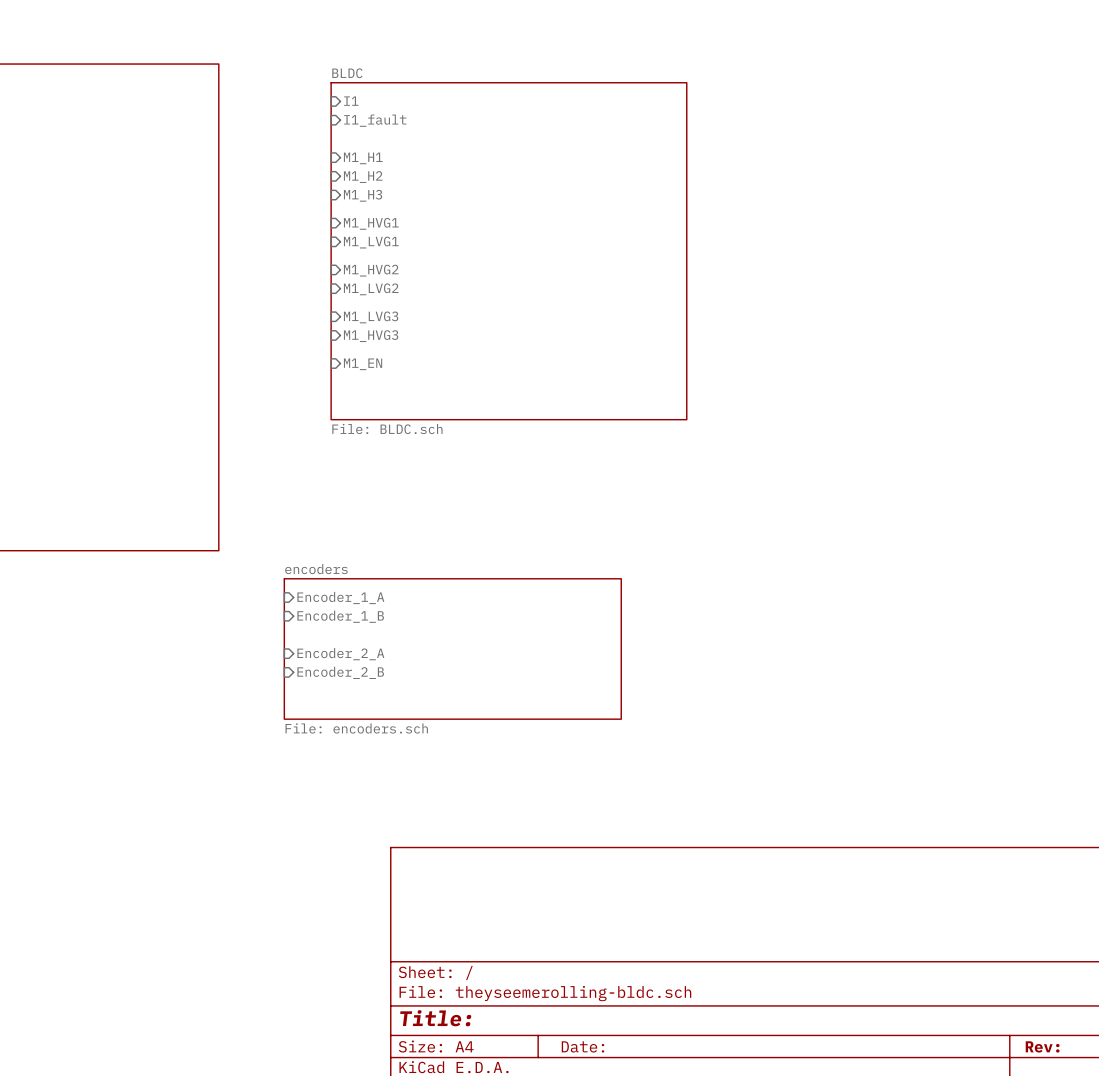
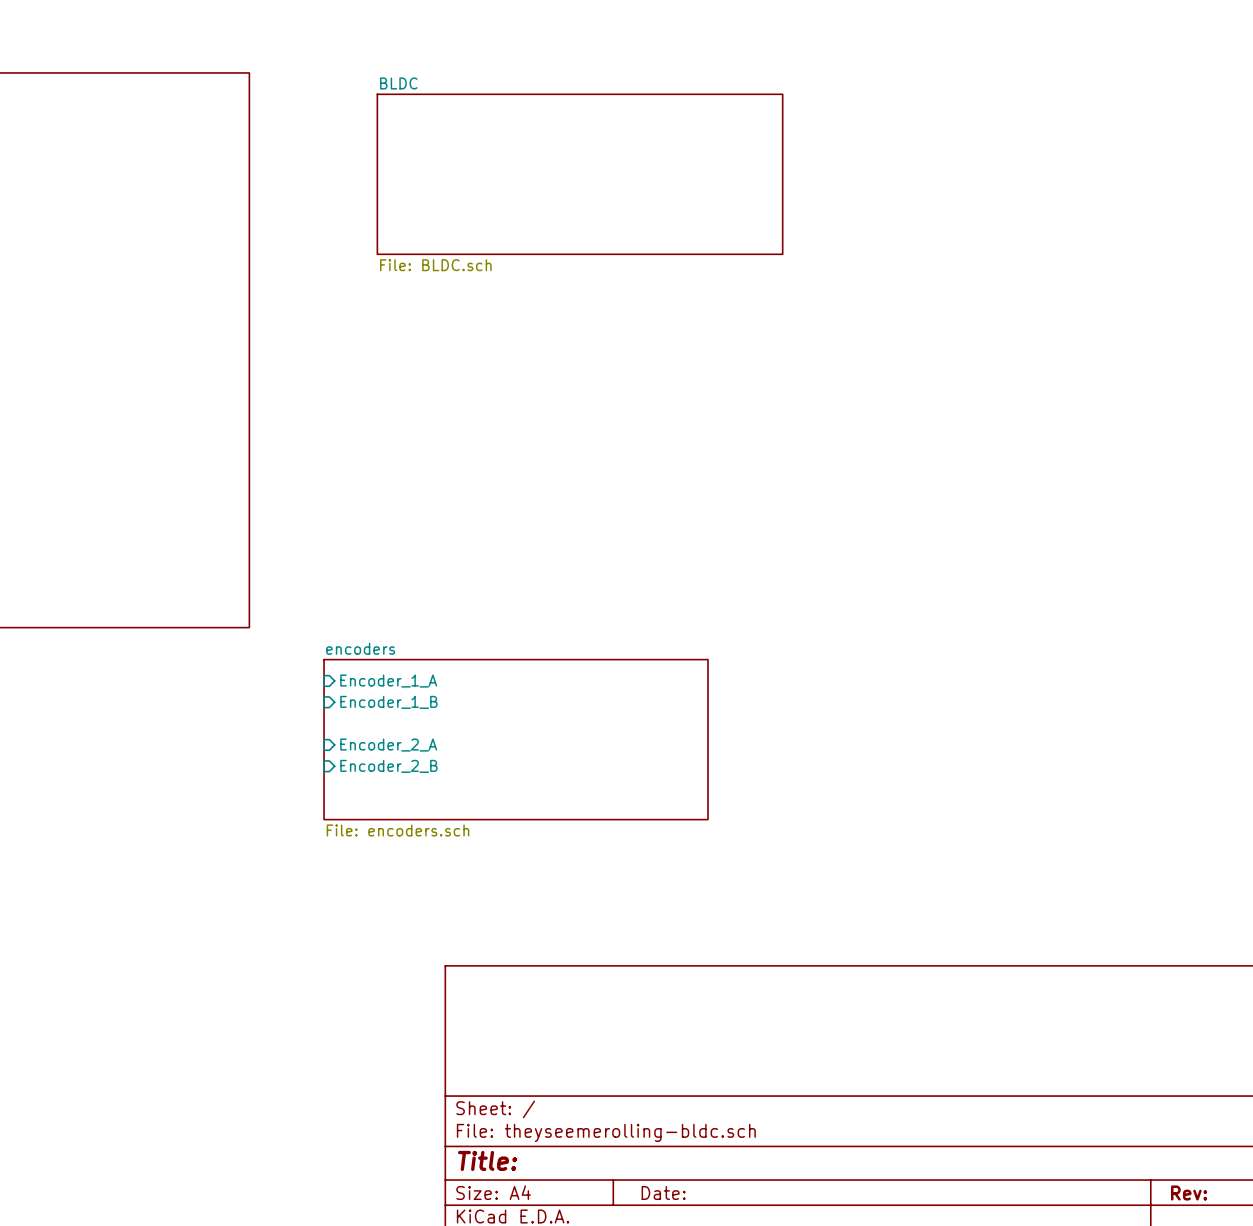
sheet pin: I1 (351, 101) -> none
sheet pin: I1_fault (375, 120) -> none
sheet BLDC: none -> File: BLDC.sch (580, 174)
sheet pin: M1_H1 (363, 158) -> none
sheet pin: M1_H2 (363, 177) -> none
sheet pin: M1_H3 (363, 195) -> none
sheet pin: M1_HVG1 (371, 223) -> none
sheet pin: M1_LVG1 (371, 242) -> none
sheet BLDC: File: BLDC.sch (508, 251) -> none
sheet pin: M1_HVG2 (371, 270) -> none
sheet pin: M1_LVG2 (371, 289) -> none
sheet pin: M1_LVG3 (371, 317) -> none
sheet pin: M1_HVG3 (371, 336) -> none
sheet pin: M1_EN (363, 364) -> none

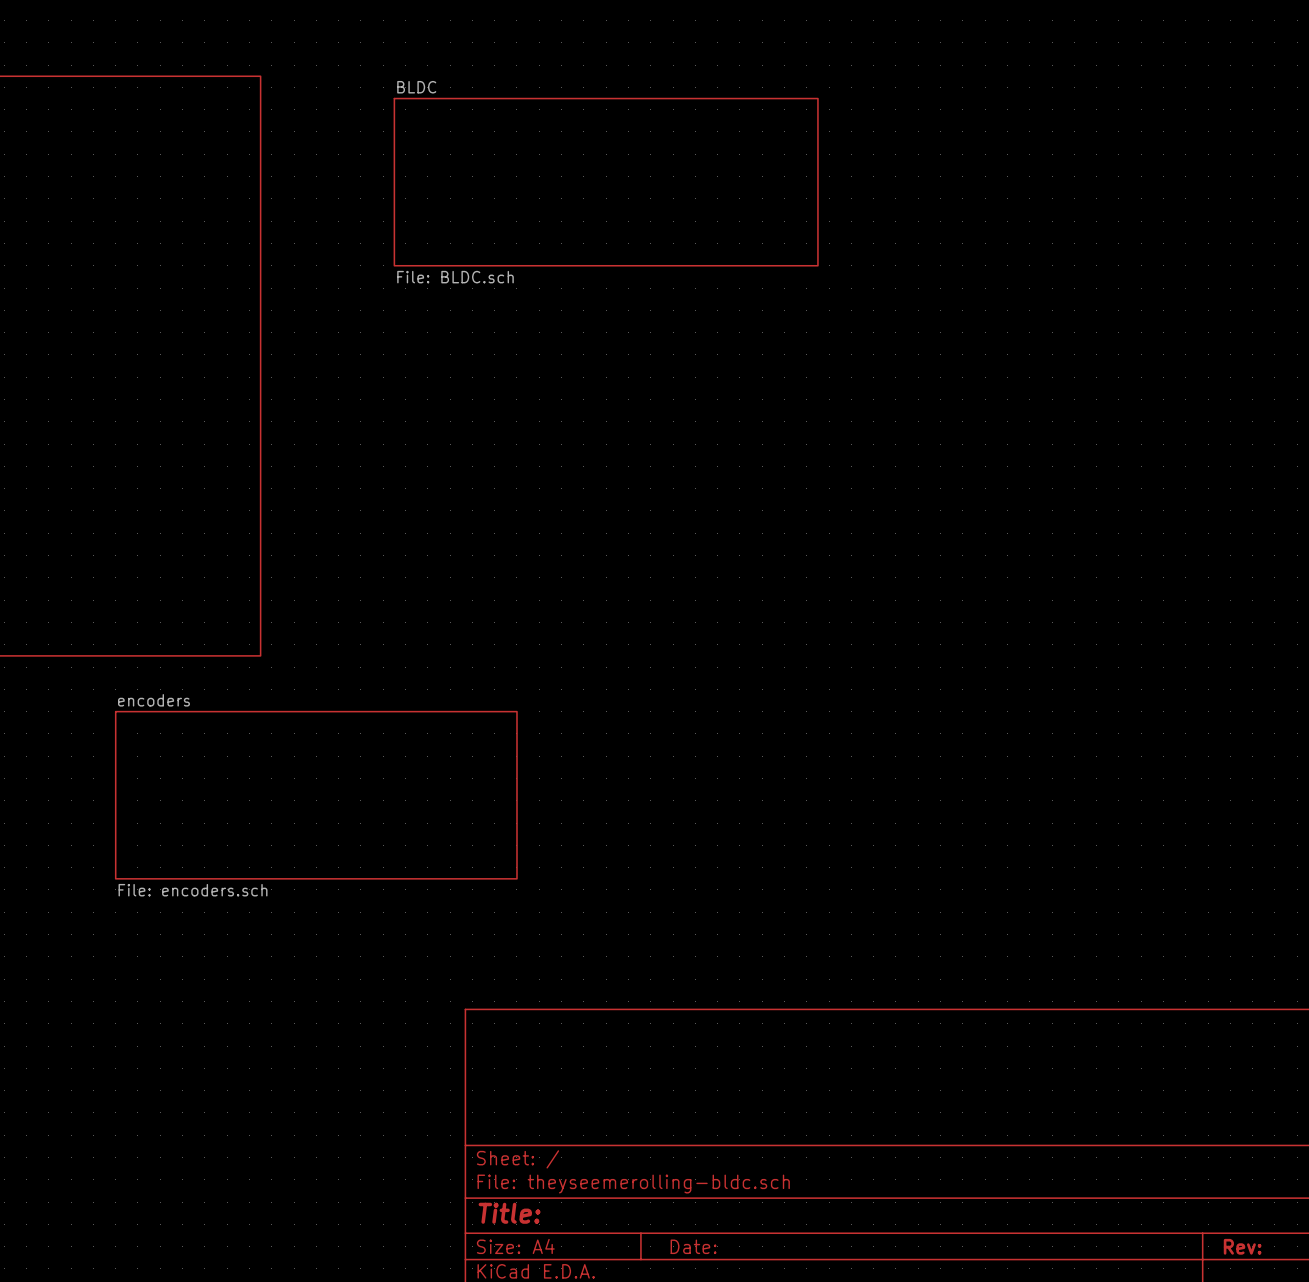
sheet pin: Encoder_1_A (388, 681) -> none
sheet pin: Encoder_1_B (388, 702) -> none
sheet encoders: File: encoders.sch (516, 739) -> none
sheet pin: Encoder_2_A (388, 745) -> none
sheet encoders: none -> File: encoders.sch (316, 795)
sheet pin: Encoder_2_B (388, 766) -> none

